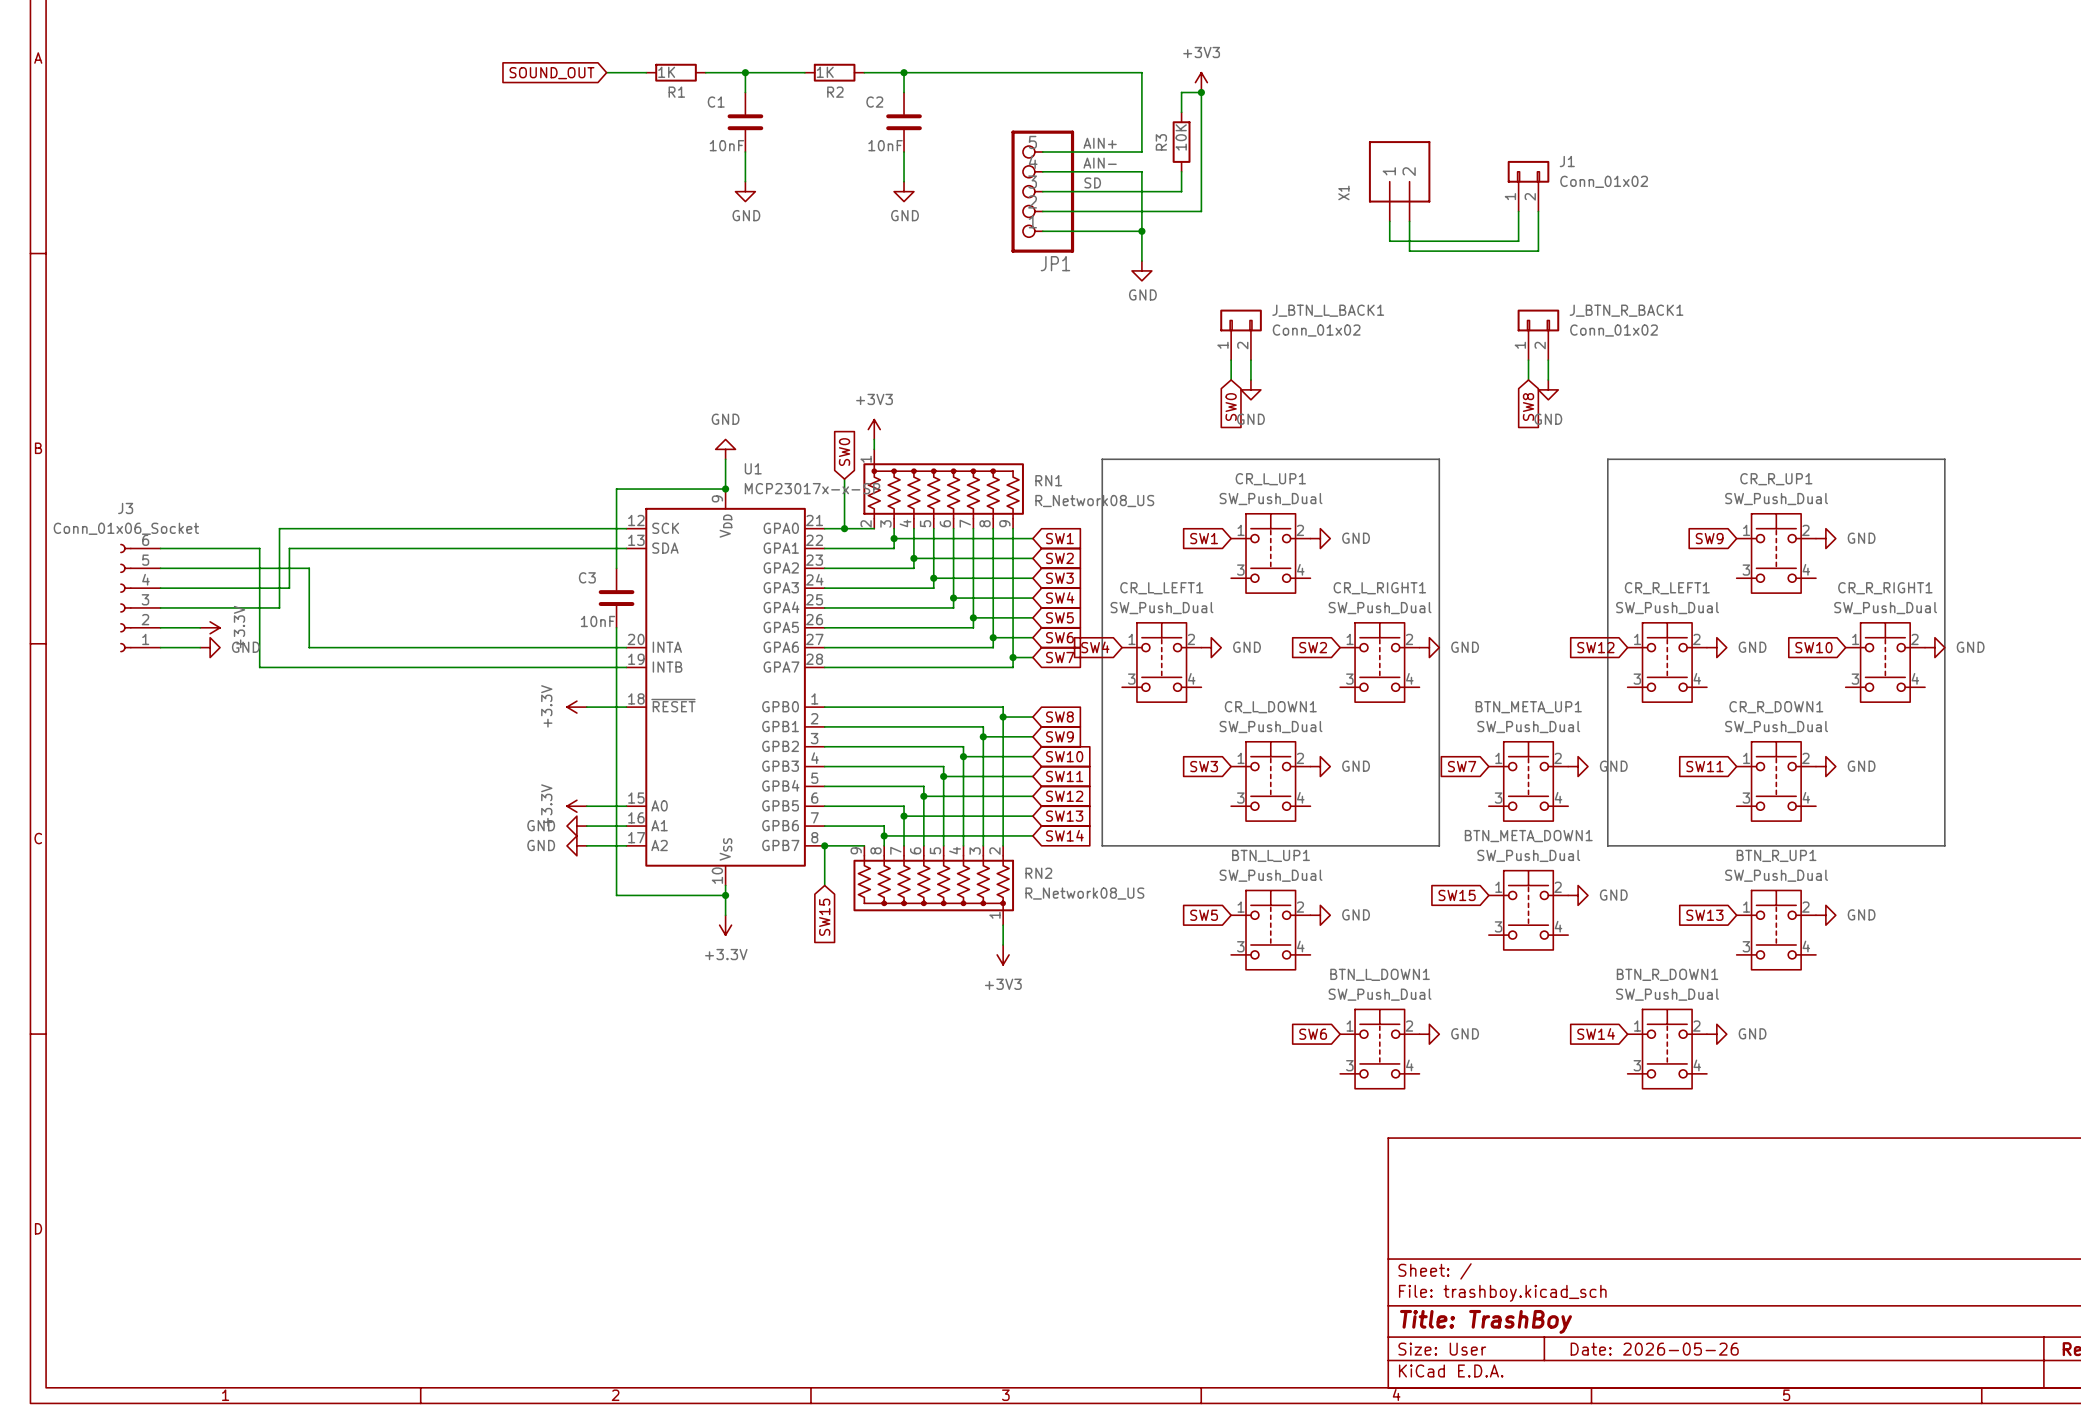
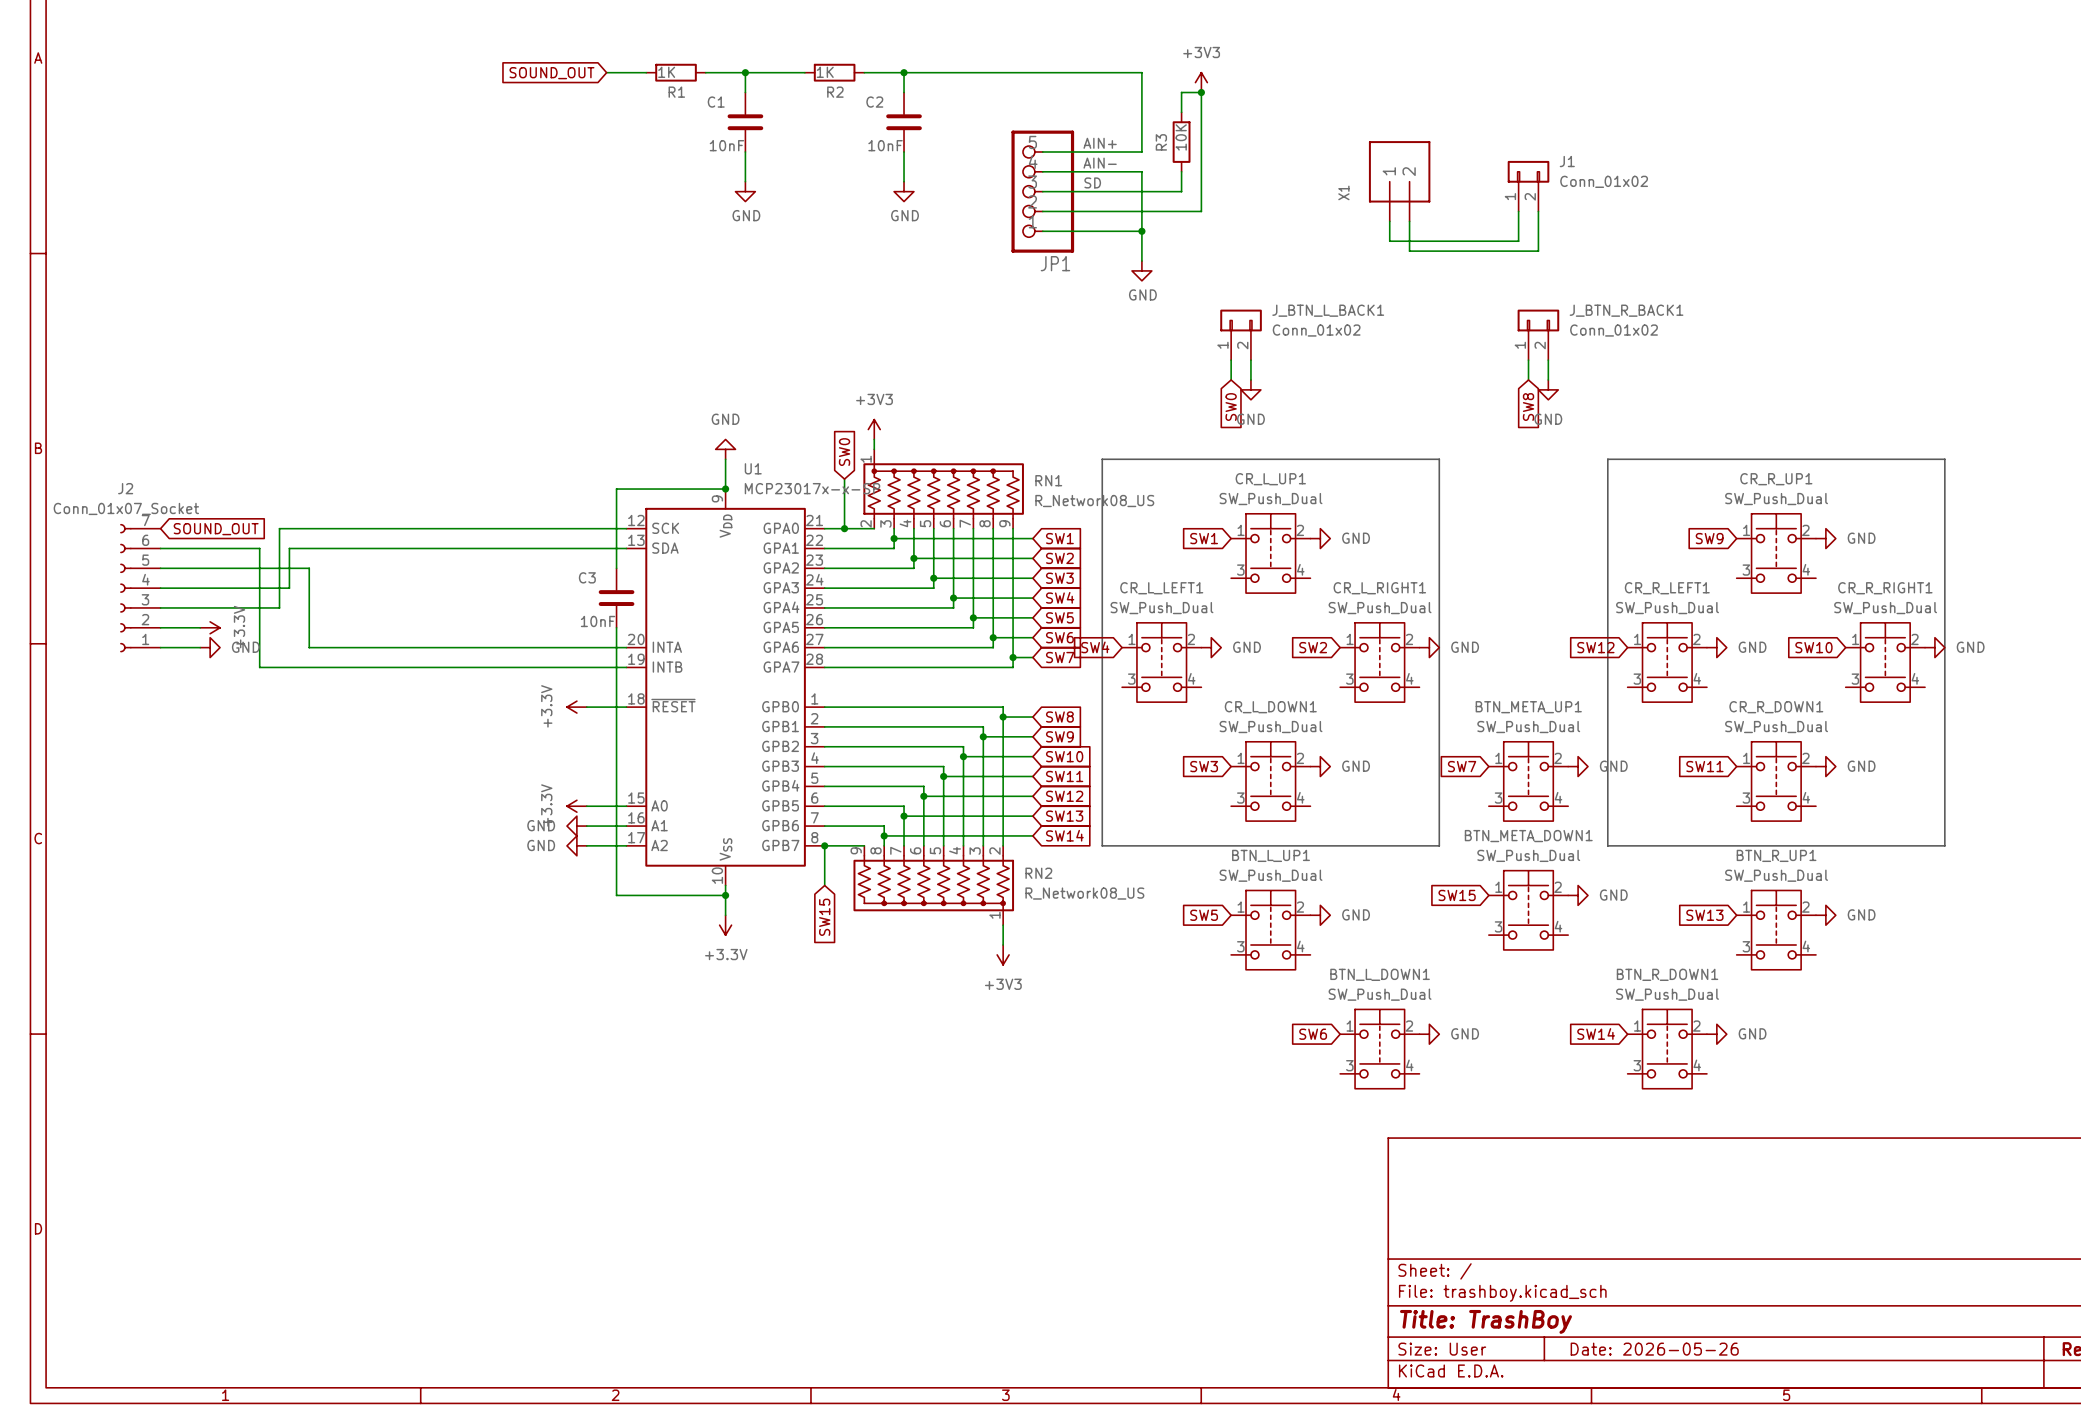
global label: none -> SOUND_OUT (216, 529)
J2: none -> Conn_01x07_Socket (140, 588)
J3: Conn_01x06_Socket (140, 598) -> none

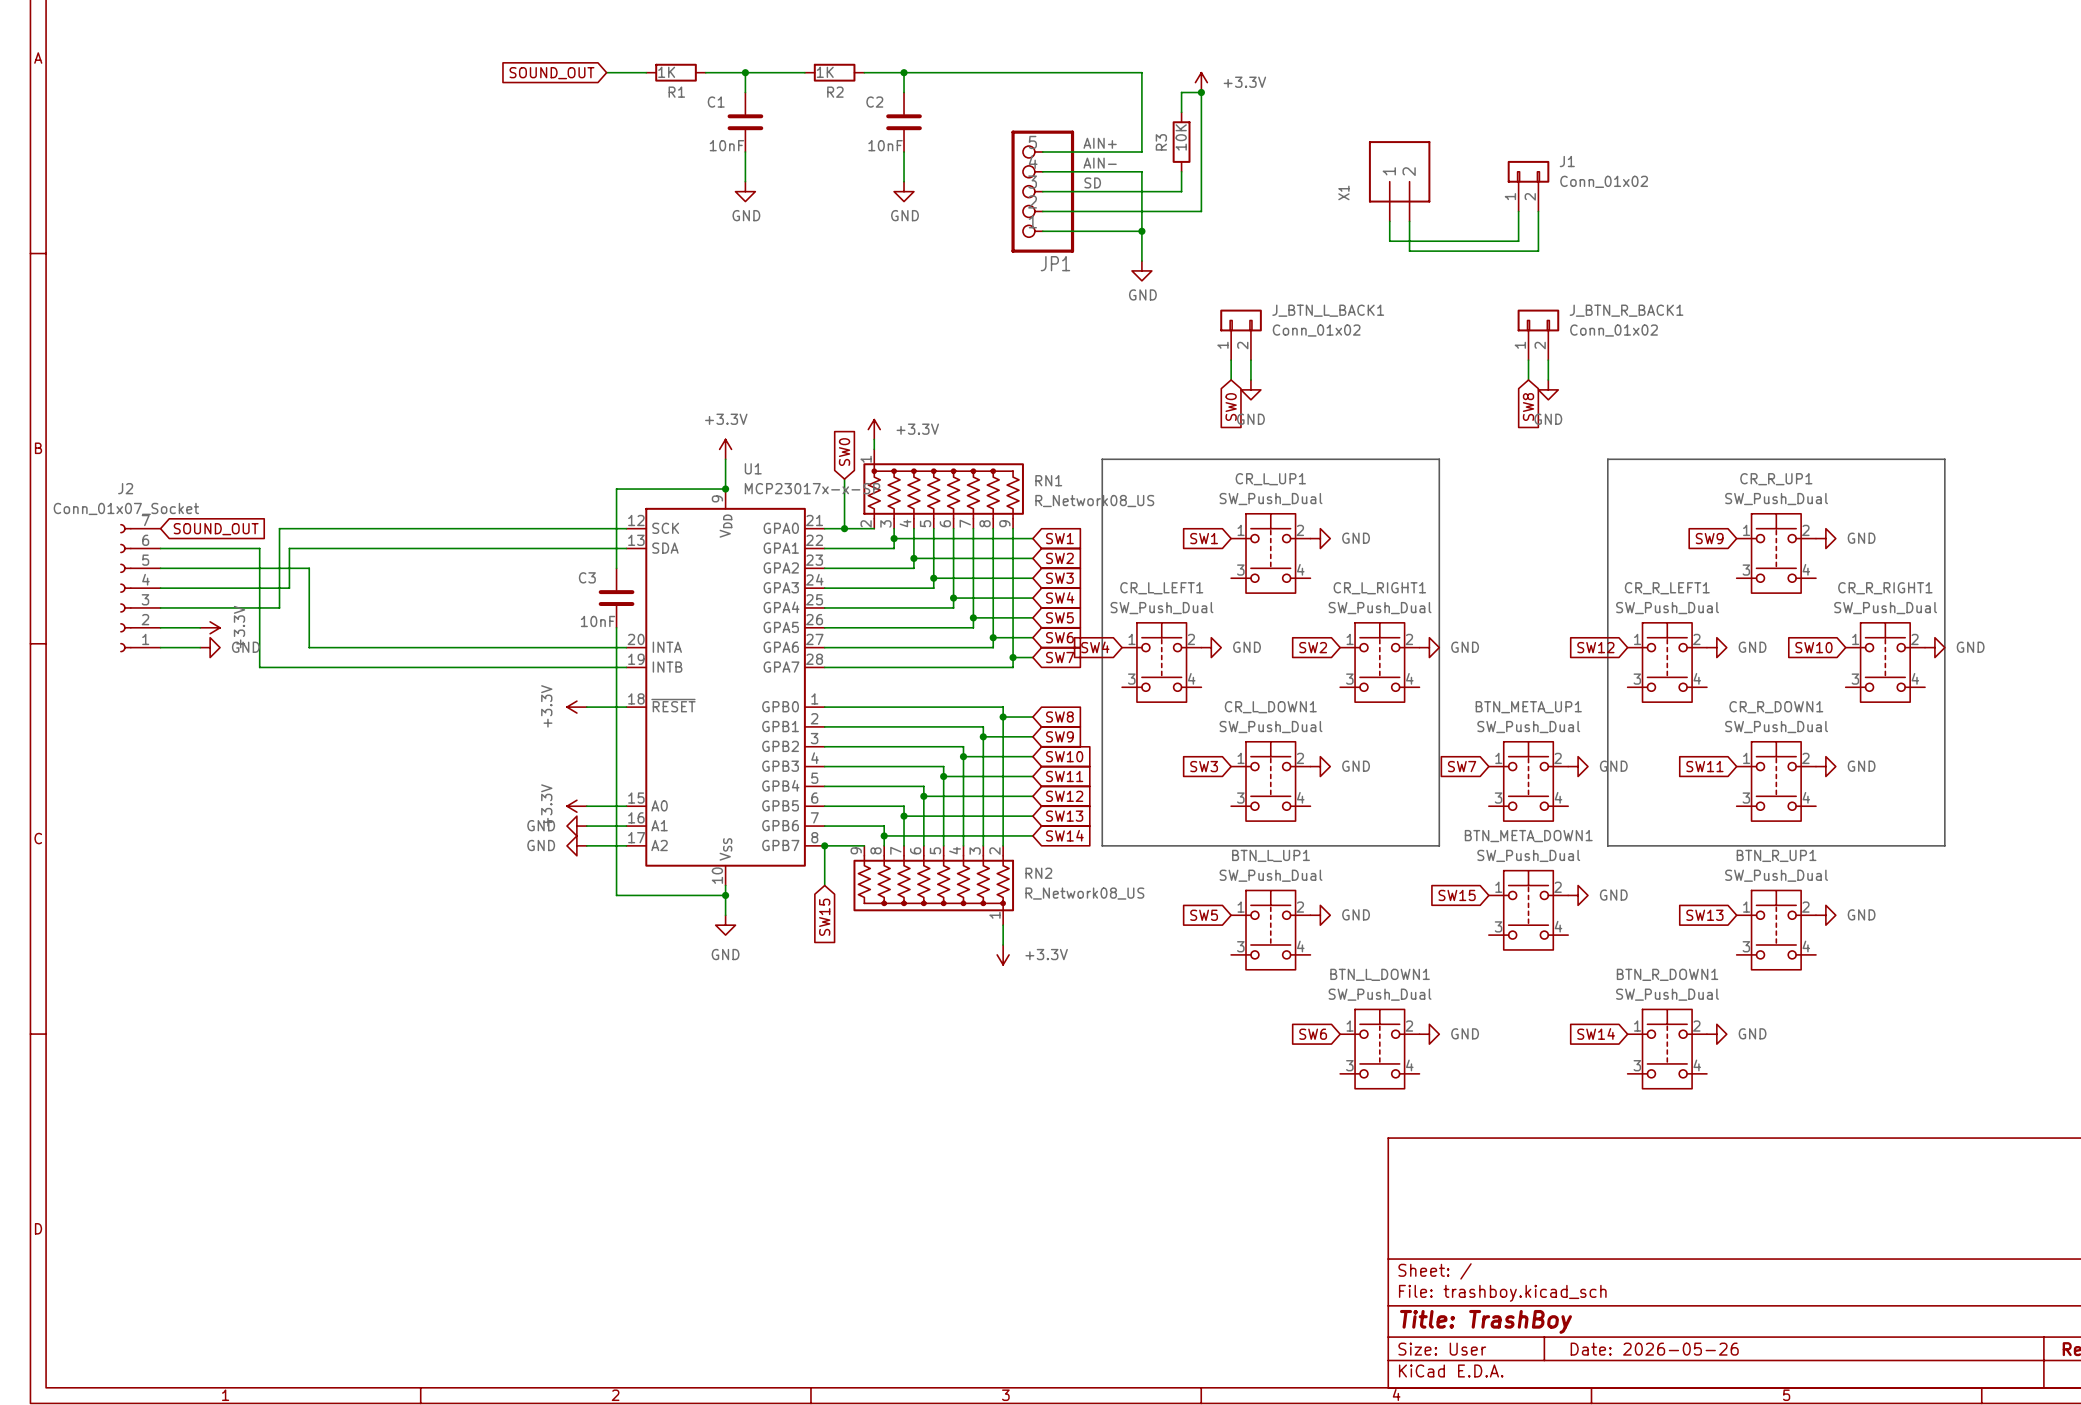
power symbol: +3V3 (1201, 82) -> +3.3V (1201, 82)
power symbol: +3V3 (874, 429) -> +3.3V (874, 429)
power symbol: GND (725, 449) -> +3.3V (725, 449)
power symbol: +3.3V (725, 925) -> GND (725, 925)
power symbol: +3V3 (1003, 954) -> +3.3V (1003, 954)

